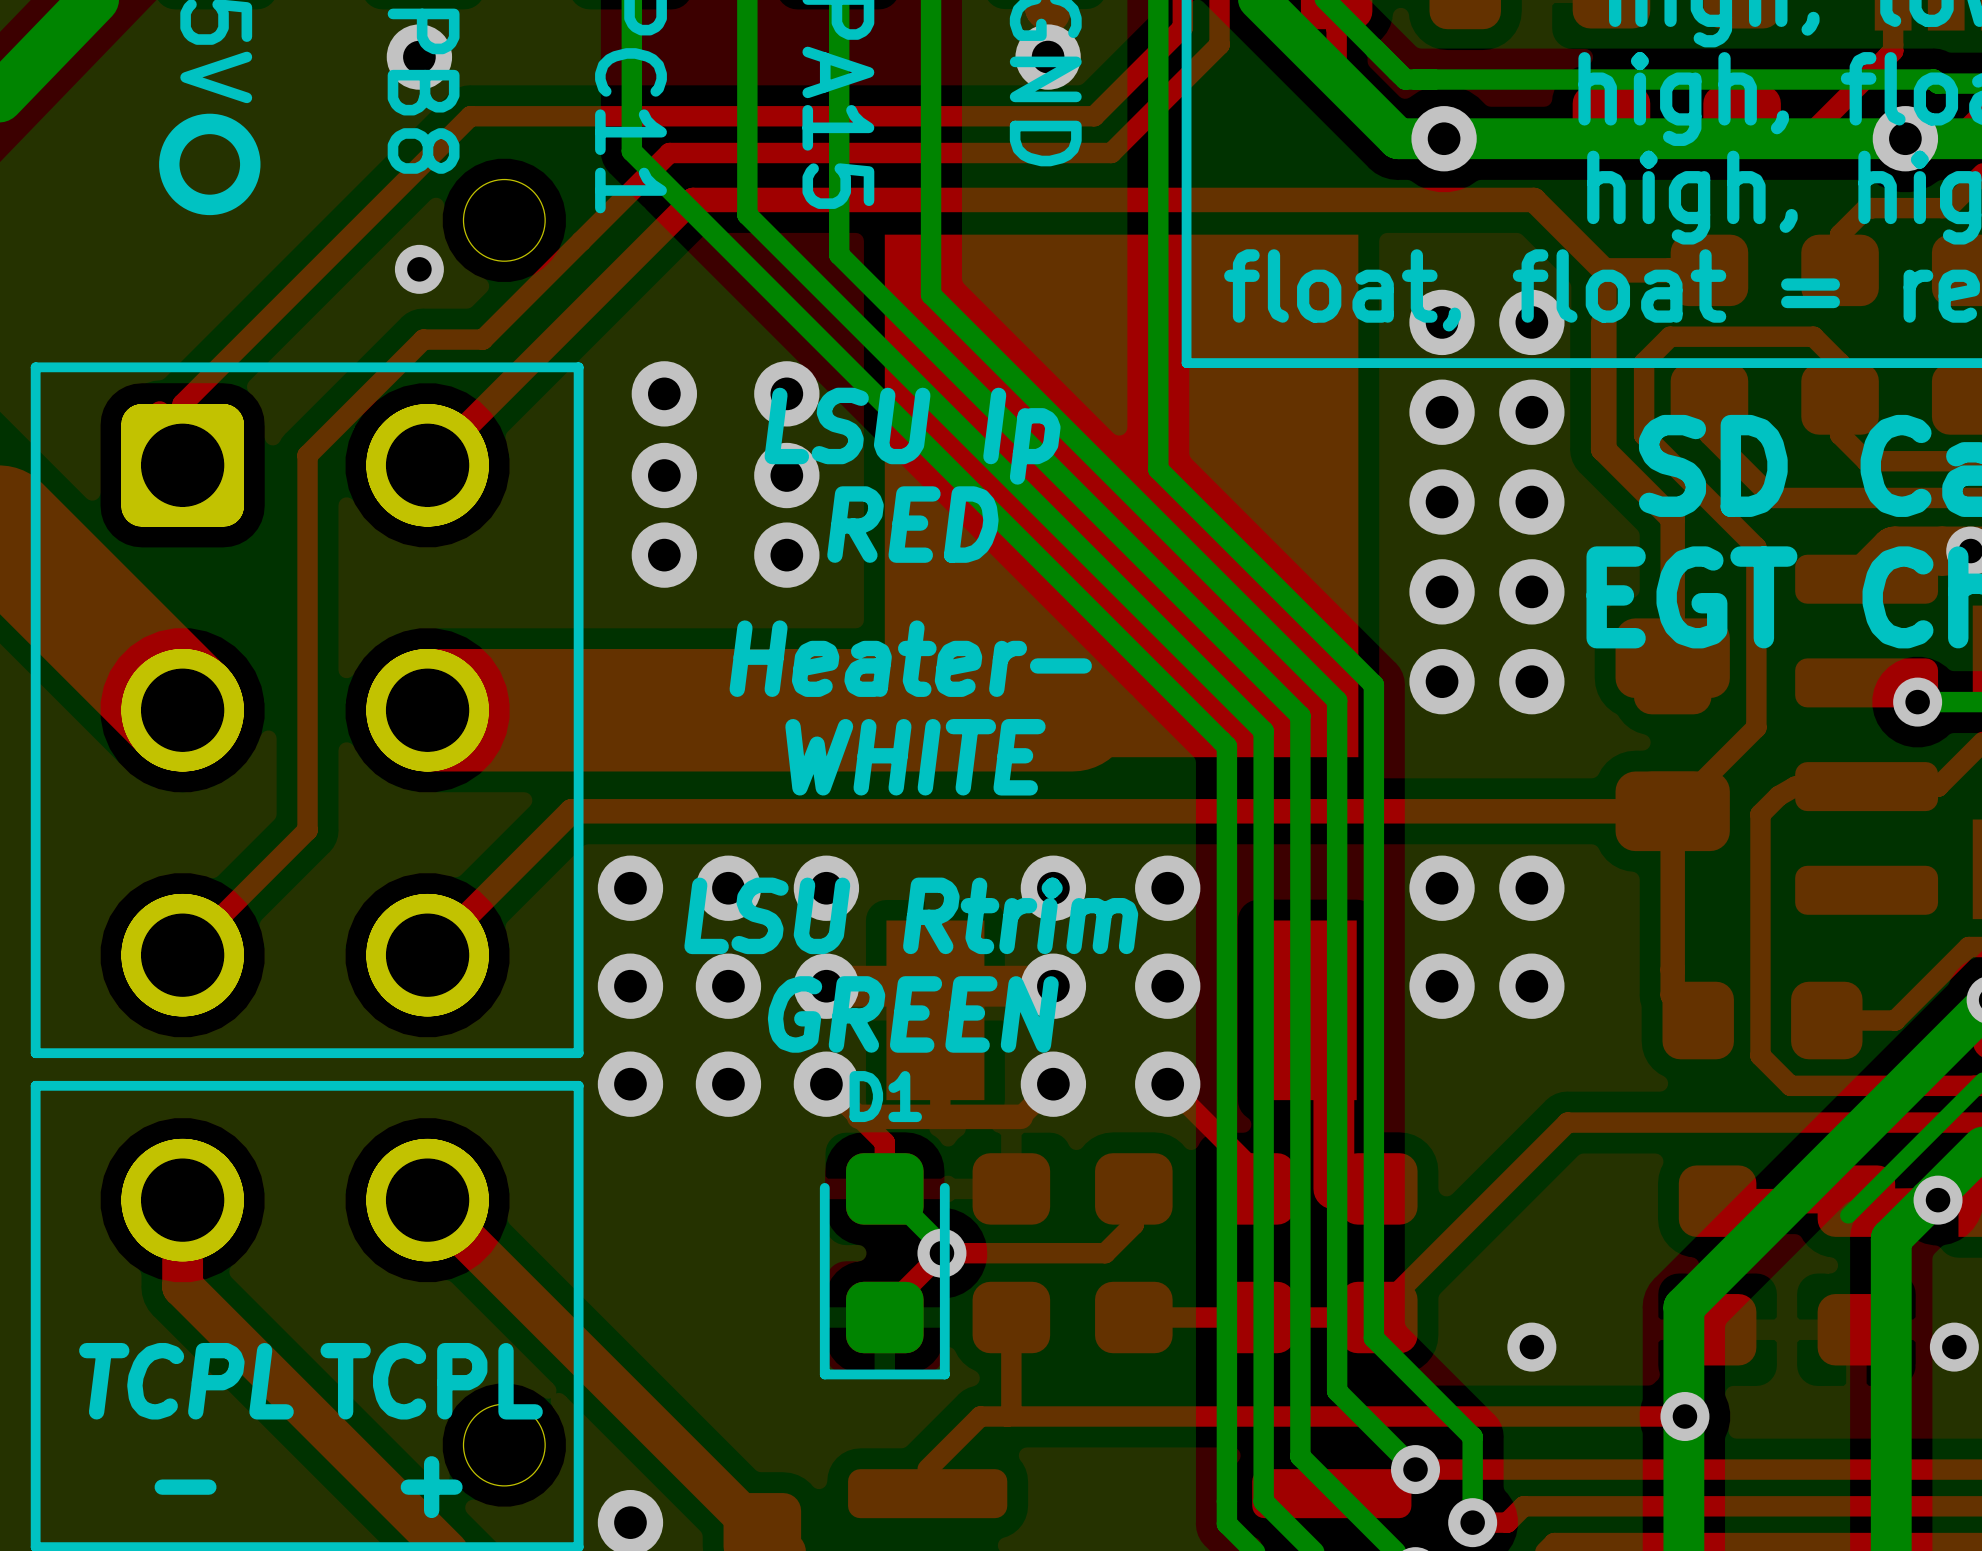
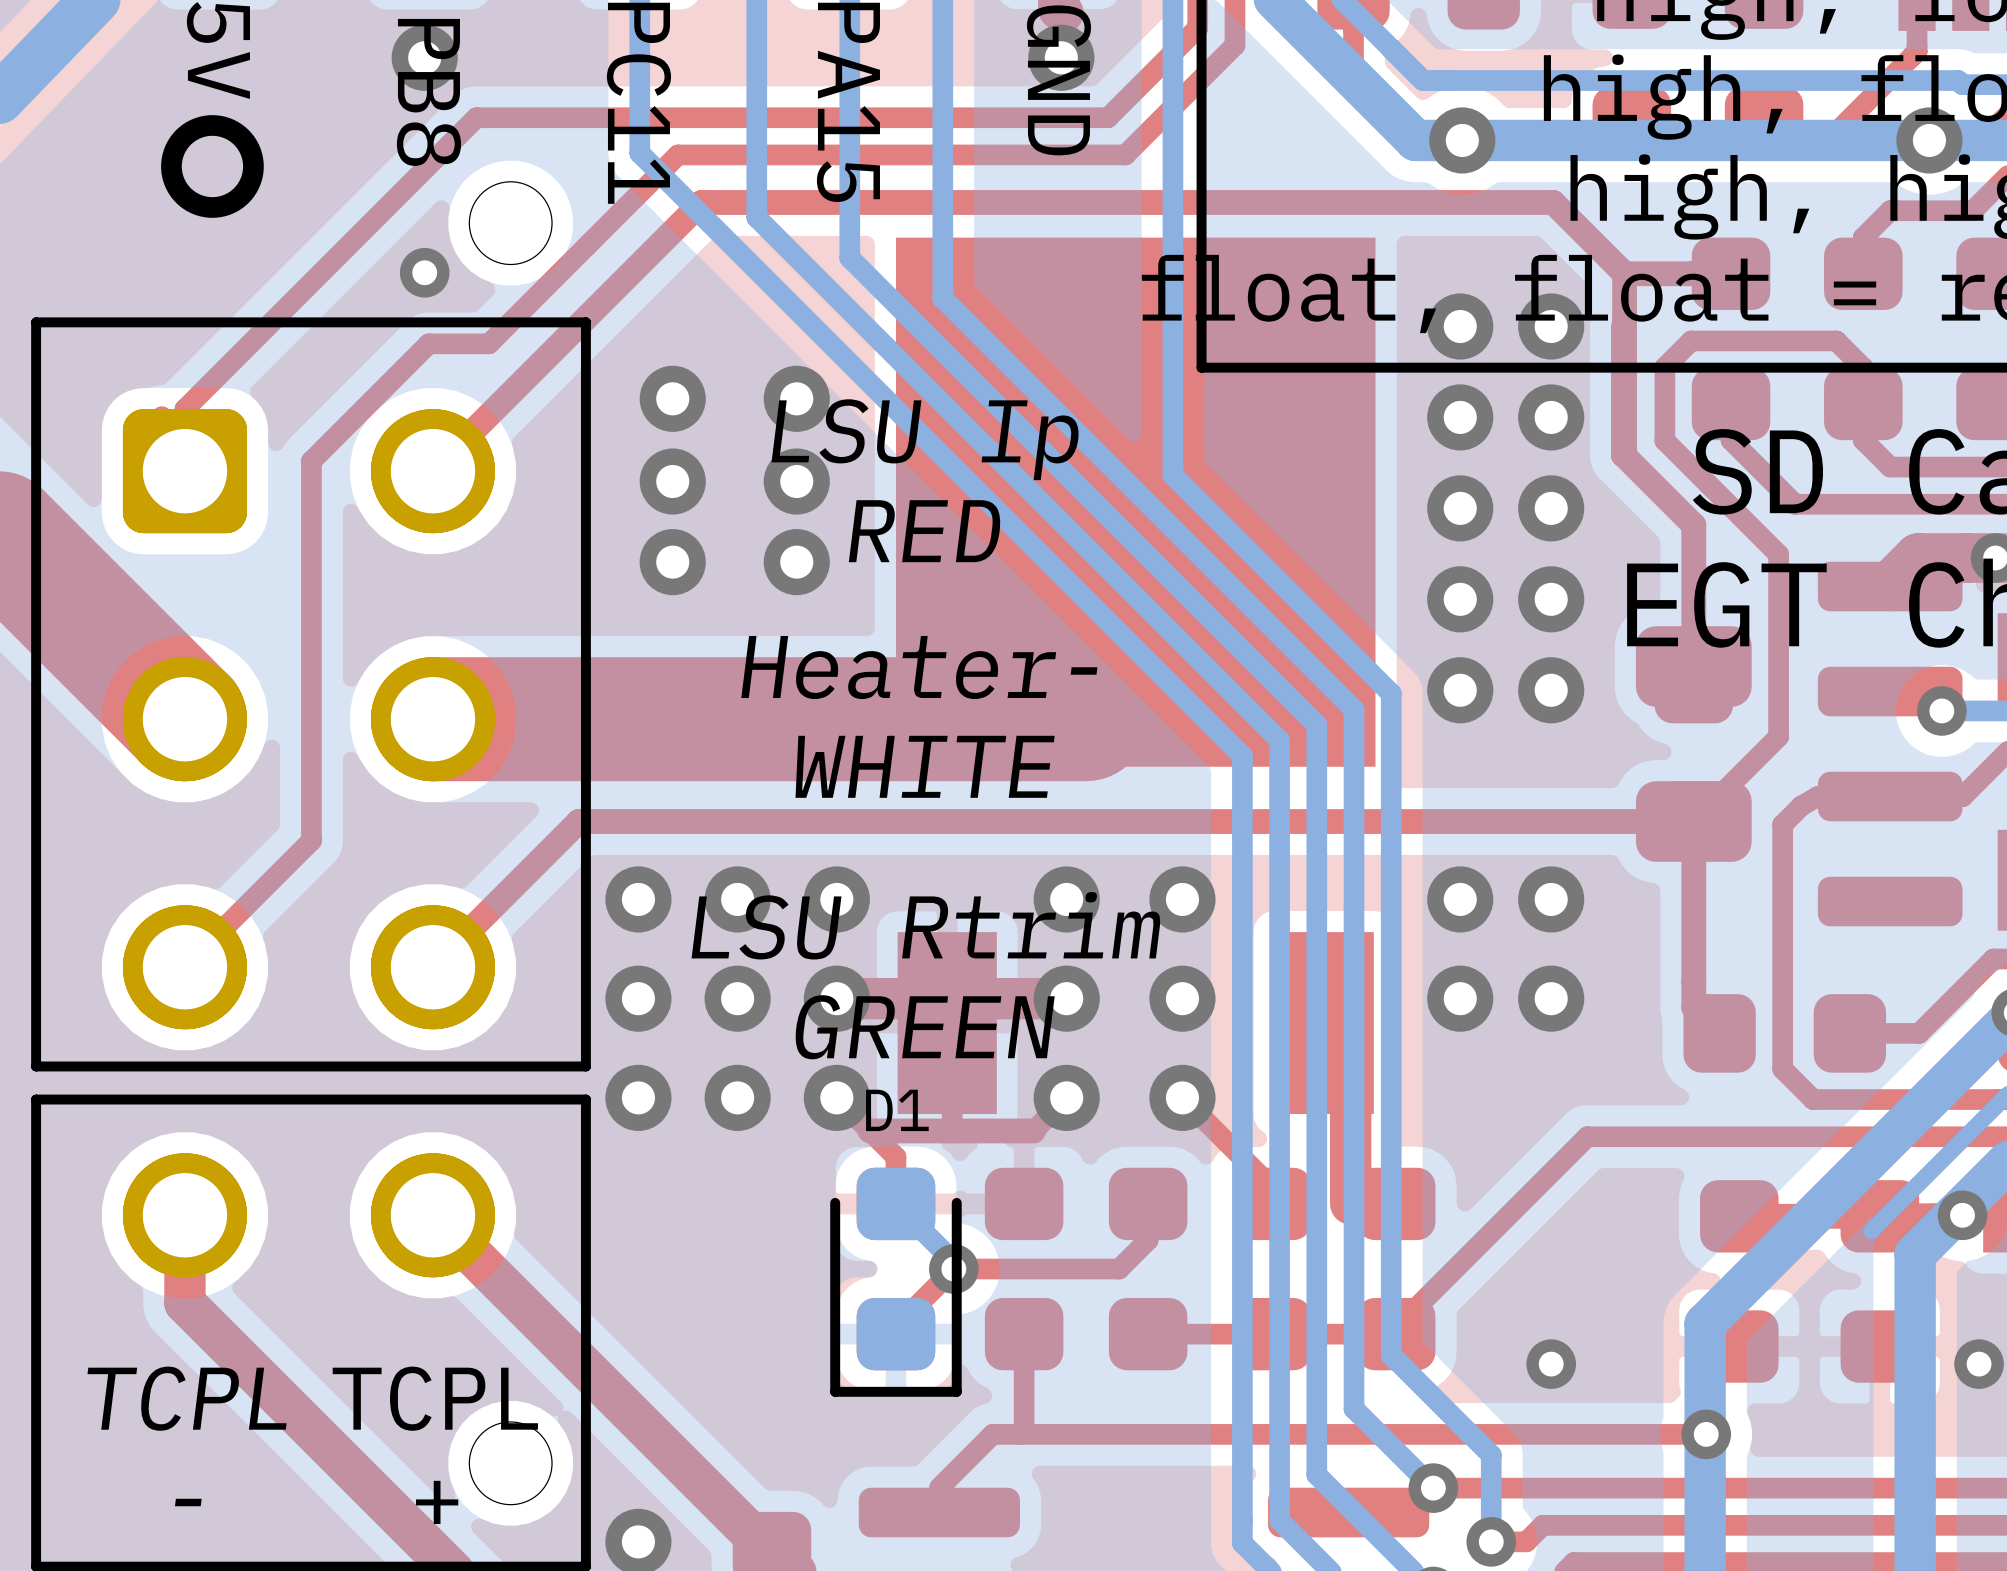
line: (578, 367) (35, 367) -> (585, 371) (585, 322) (36, 322) (36, 371)

